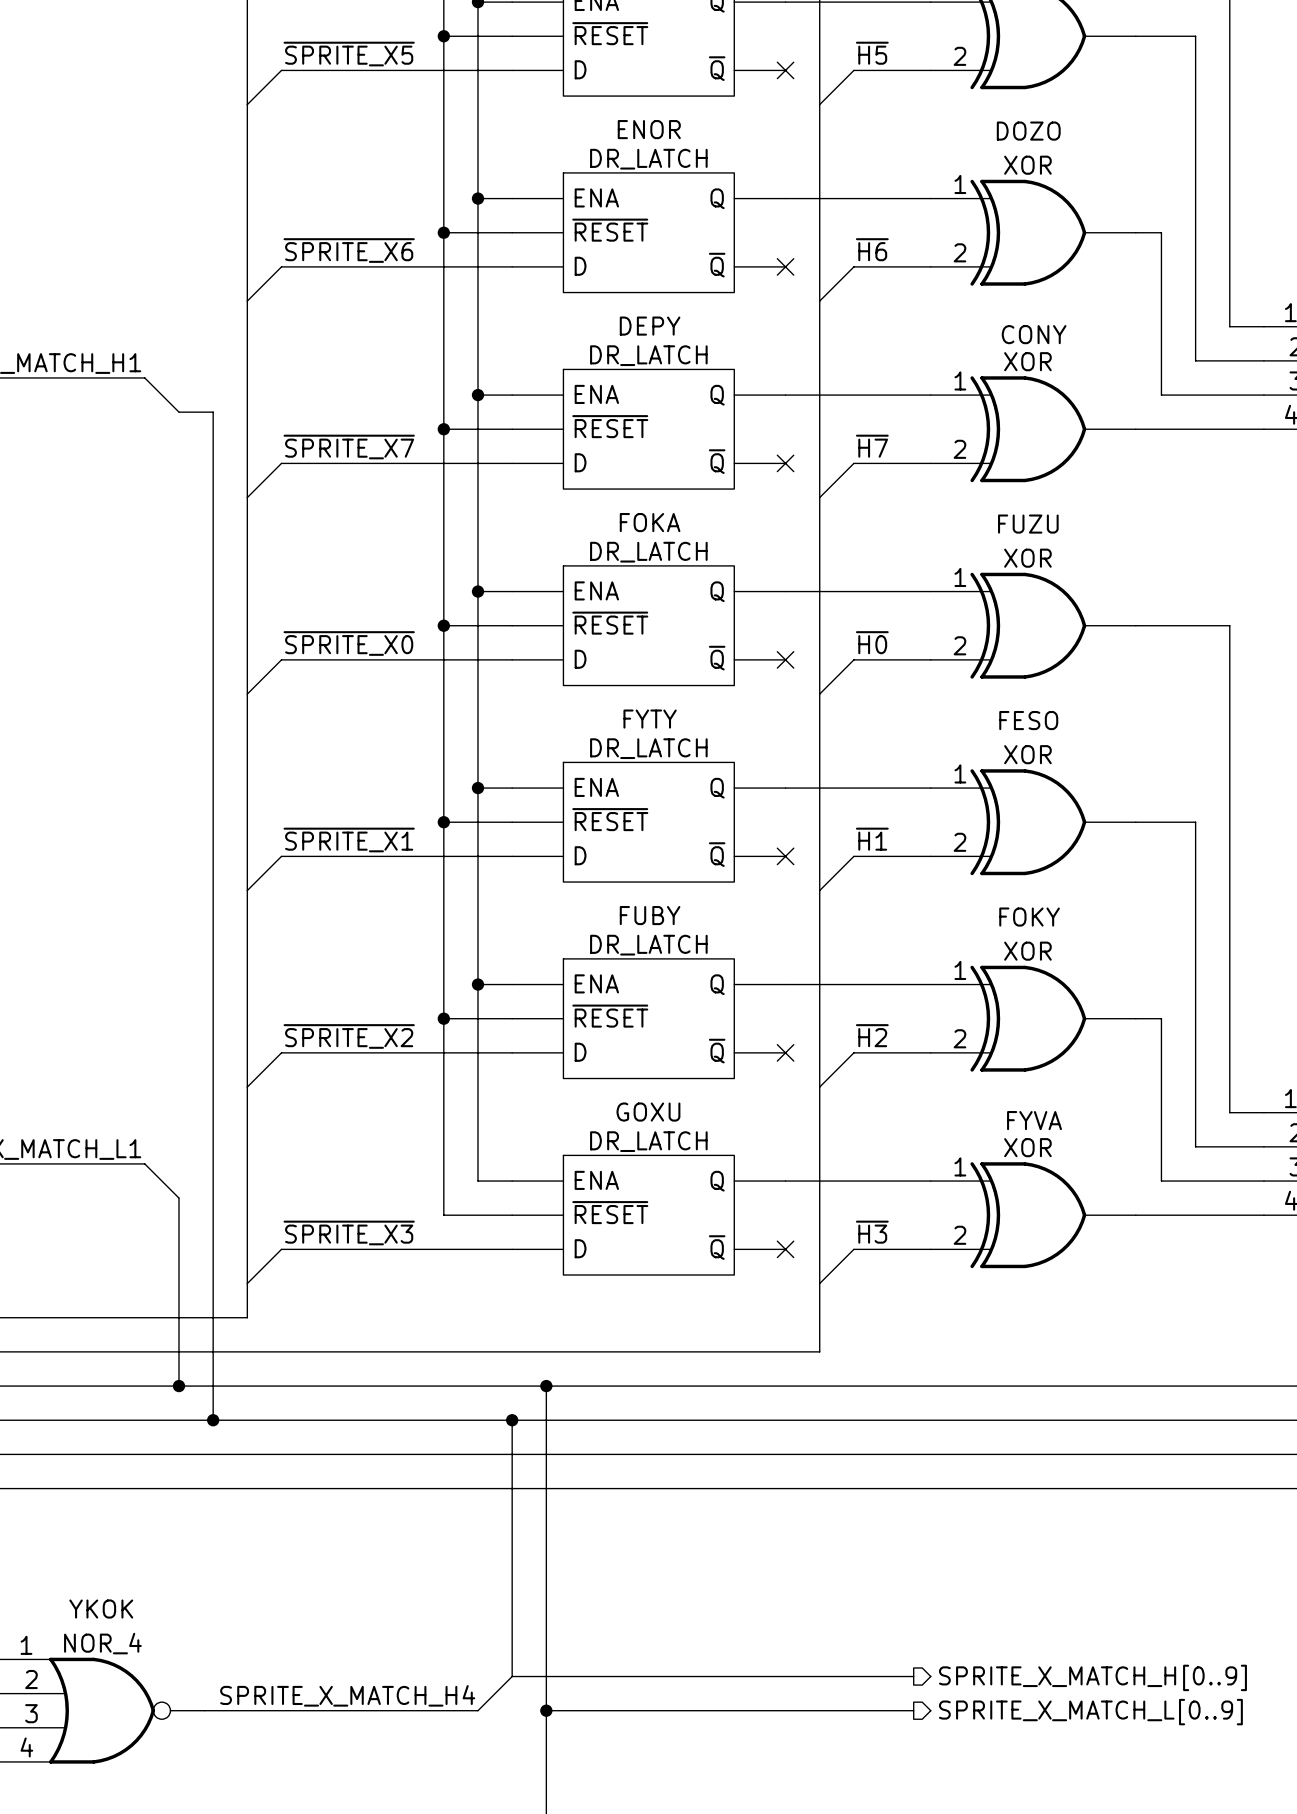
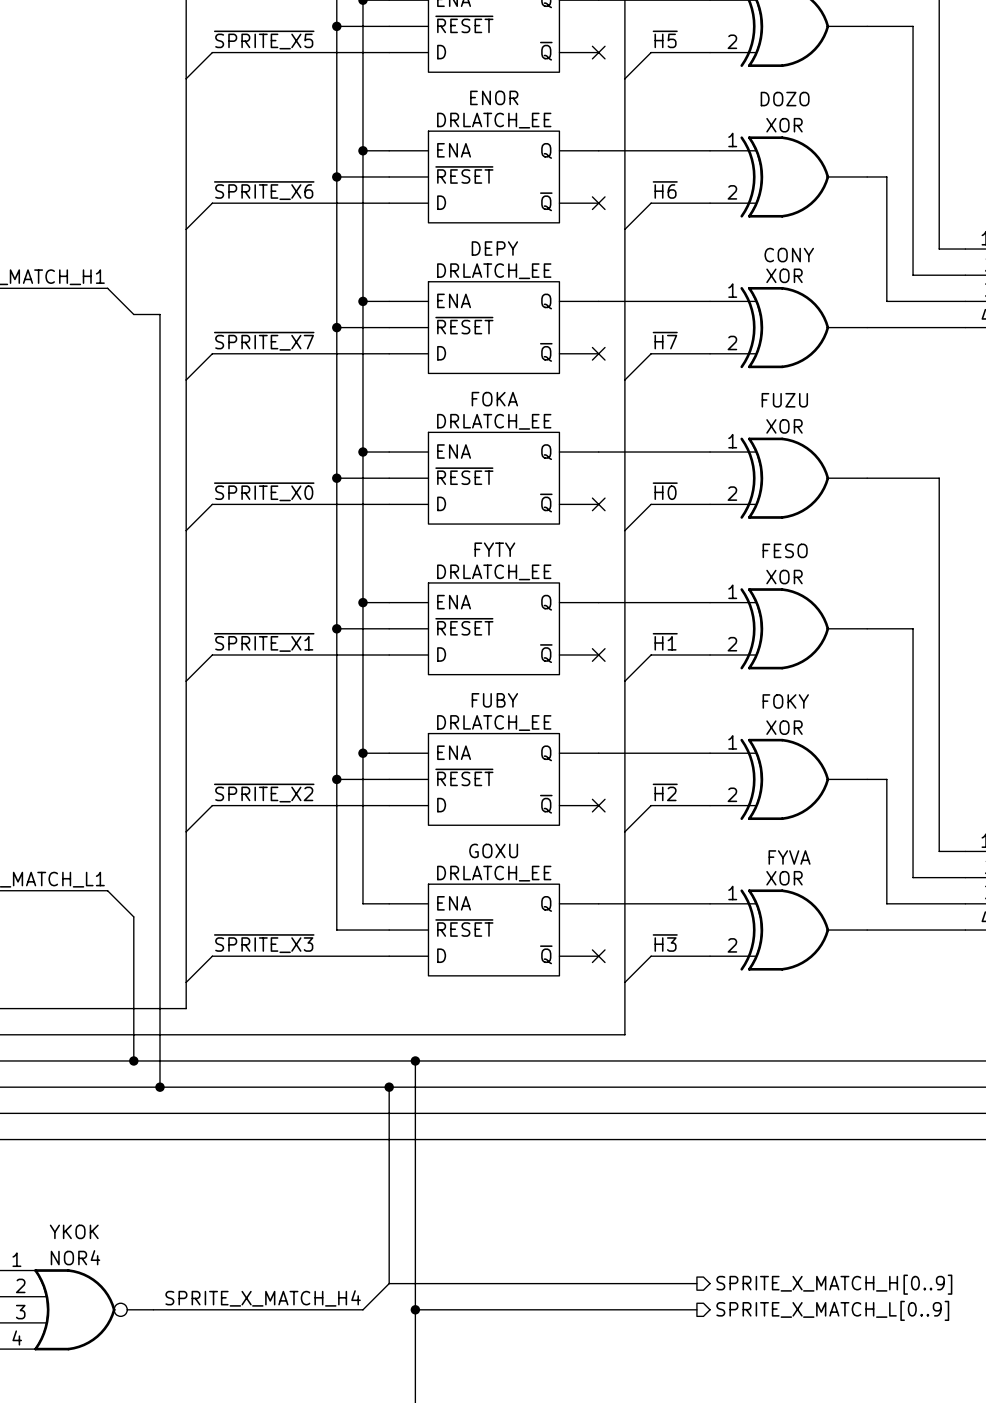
ENOR value: DR_LATCH (648, 159) -> DRLATCH_EE (494, 120)
DEPY value: DR_LATCH (648, 355) -> DRLATCH_EE (494, 271)
FOKA value: DR_LATCH (648, 552) -> DRLATCH_EE (494, 421)
FYTY value: DR_LATCH (648, 748) -> DRLATCH_EE (494, 572)
FUBY value: DR_LATCH (648, 945) -> DRLATCH_EE (494, 723)
GOXU value: DR_LATCH (648, 1141) -> DRLATCH_EE (494, 873)
YKOK value: NOR_4 (102, 1643) -> NOR4 (75, 1257)

